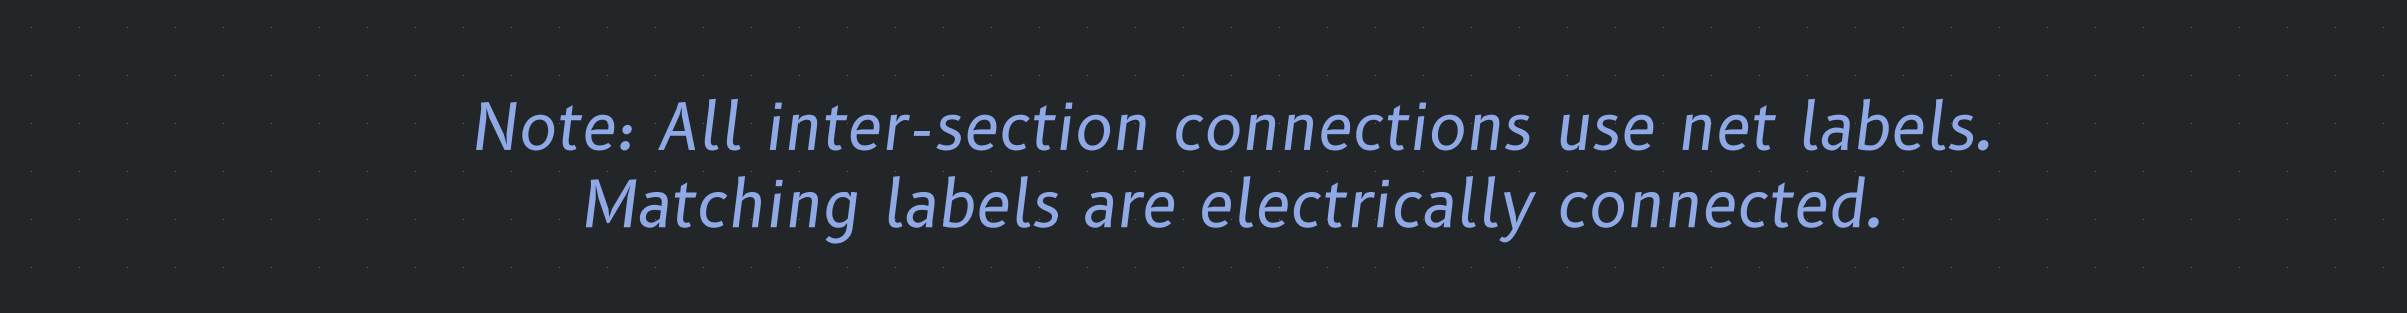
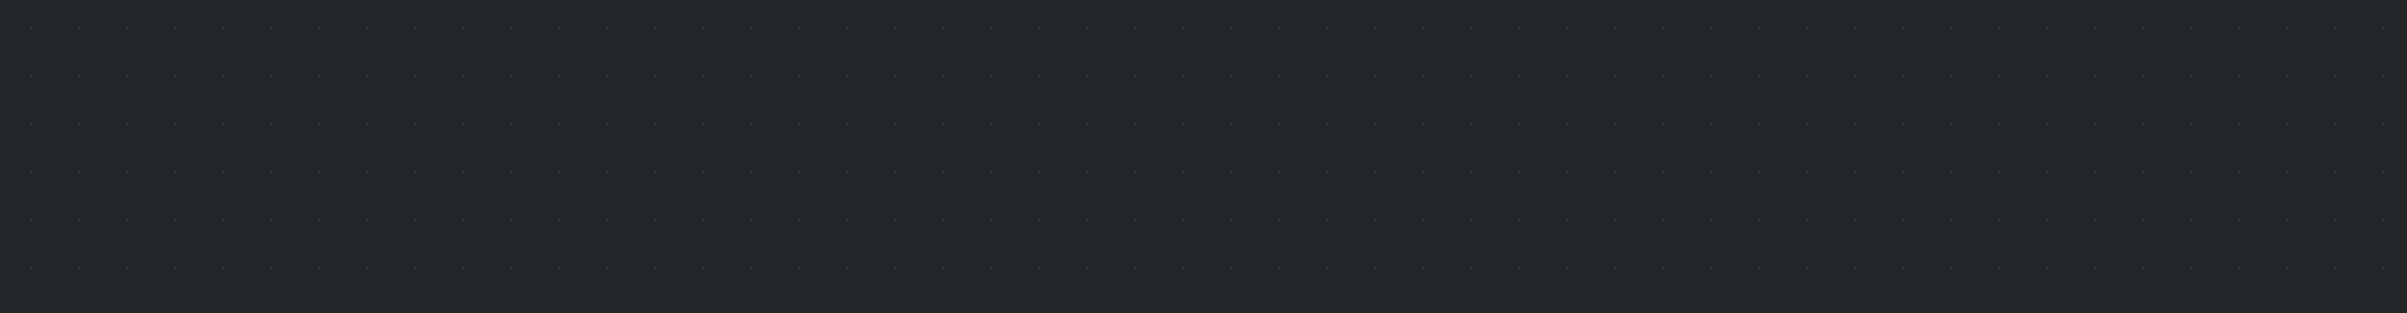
text: Note: All inter-section connections use net labels. (1232, 124) -> none
text: Matching labels are electrically connected. (1232, 209) -> none

